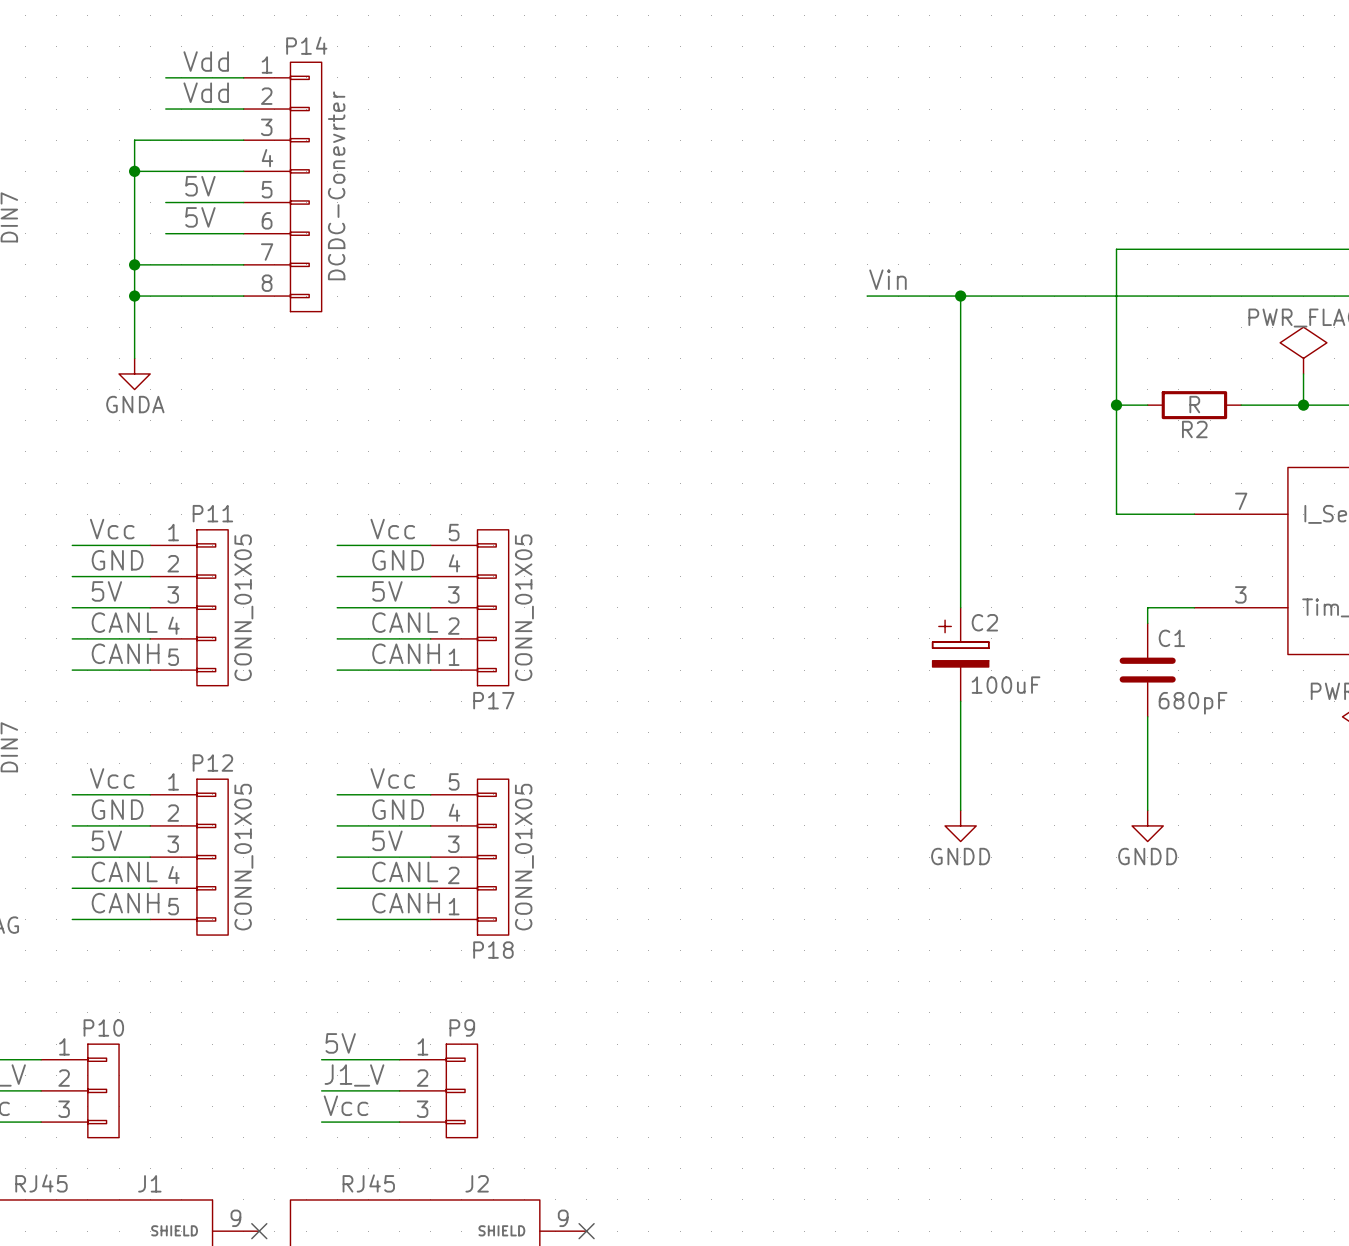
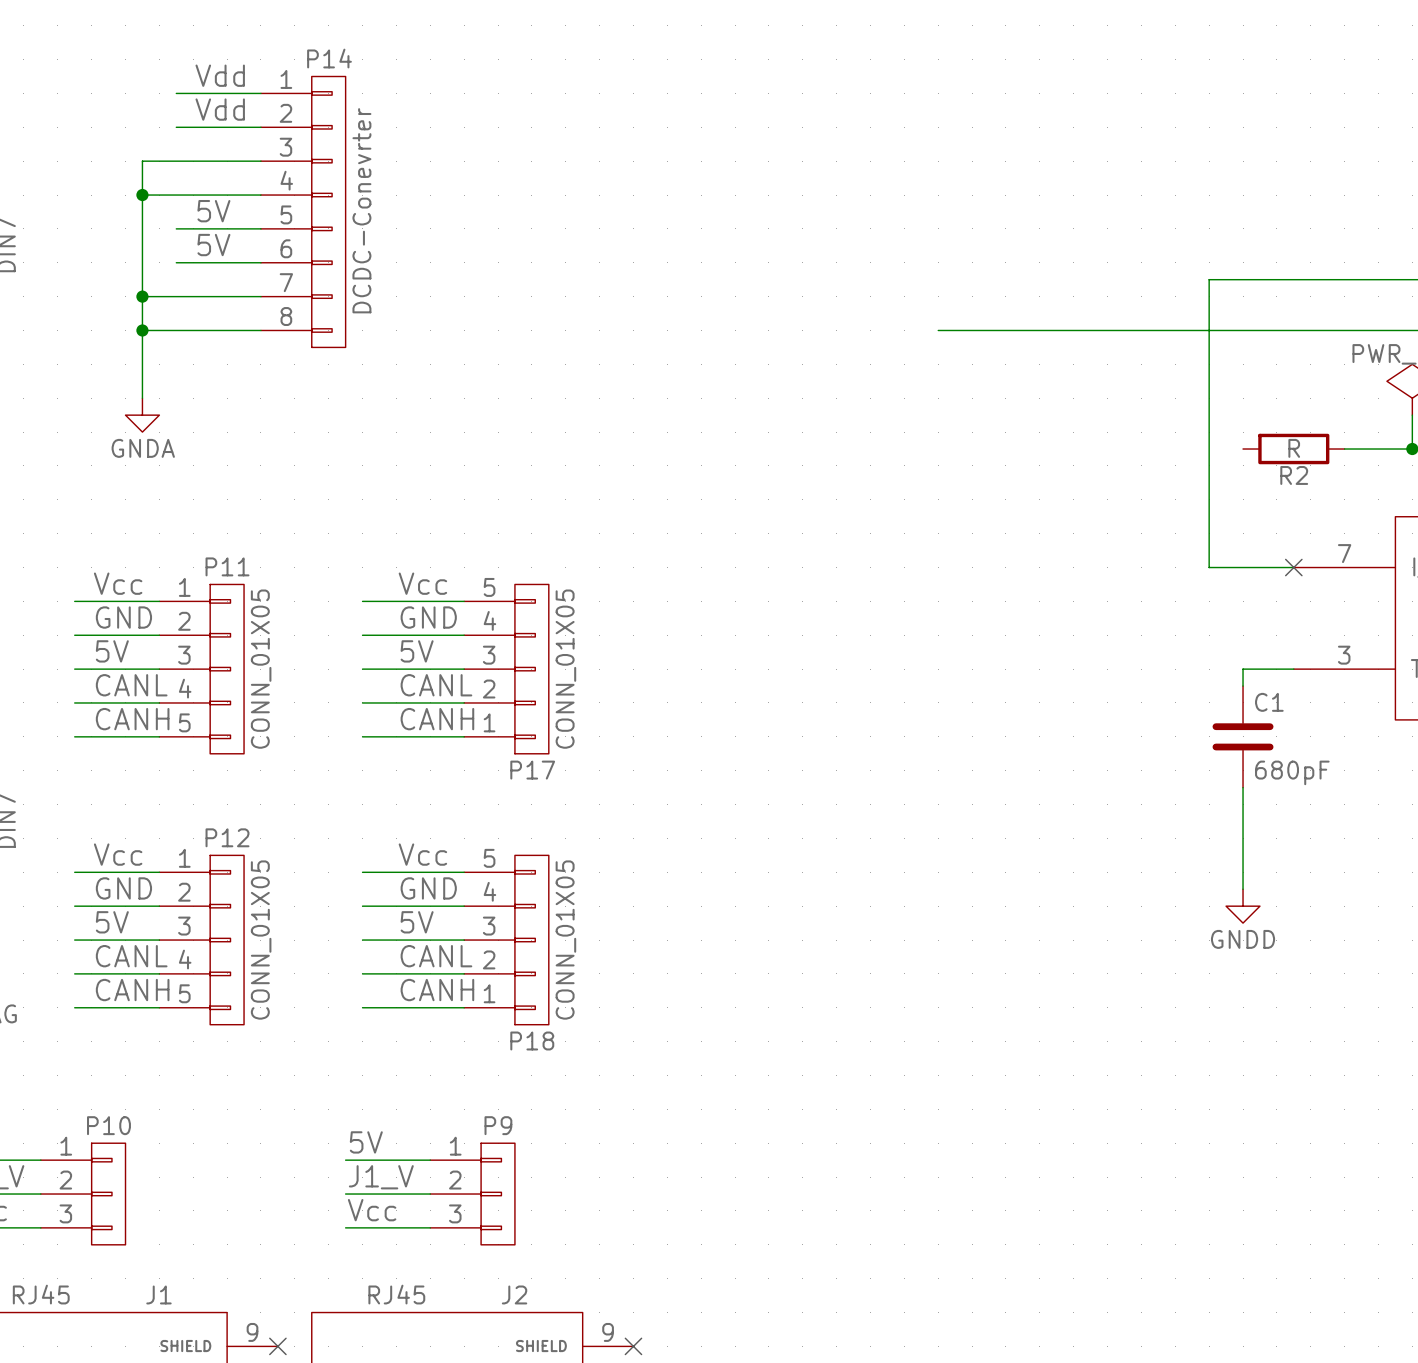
label: Vin (887, 279) -> none
wire: (960, 296) (960, 607) -> none
junction: (960, 296) -> none
wire: (1116, 405) (1147, 405) -> none
junction: (1116, 405) -> none
no-connect mark: none -> (1293, 567)
C2: 100uF (960, 654) -> none
wire: (960, 701) (960, 810) -> none
power symbol: GNDD (960, 825) -> none

